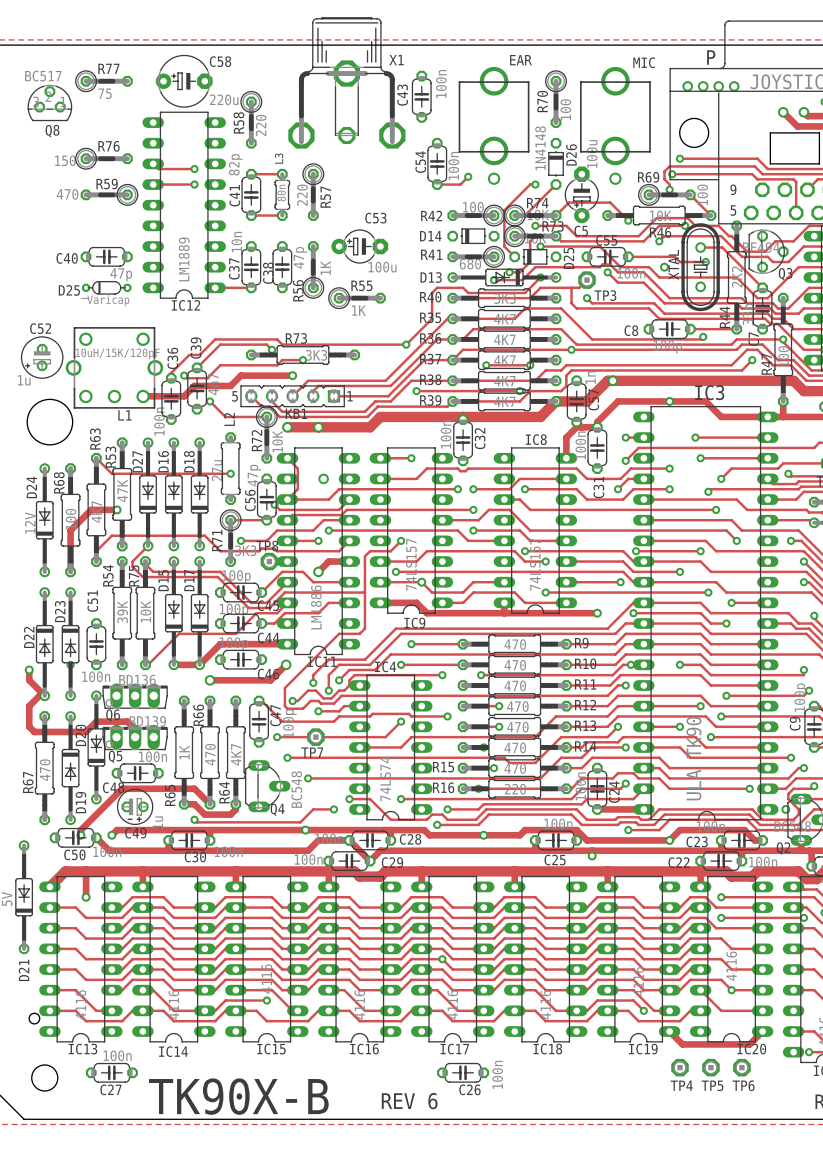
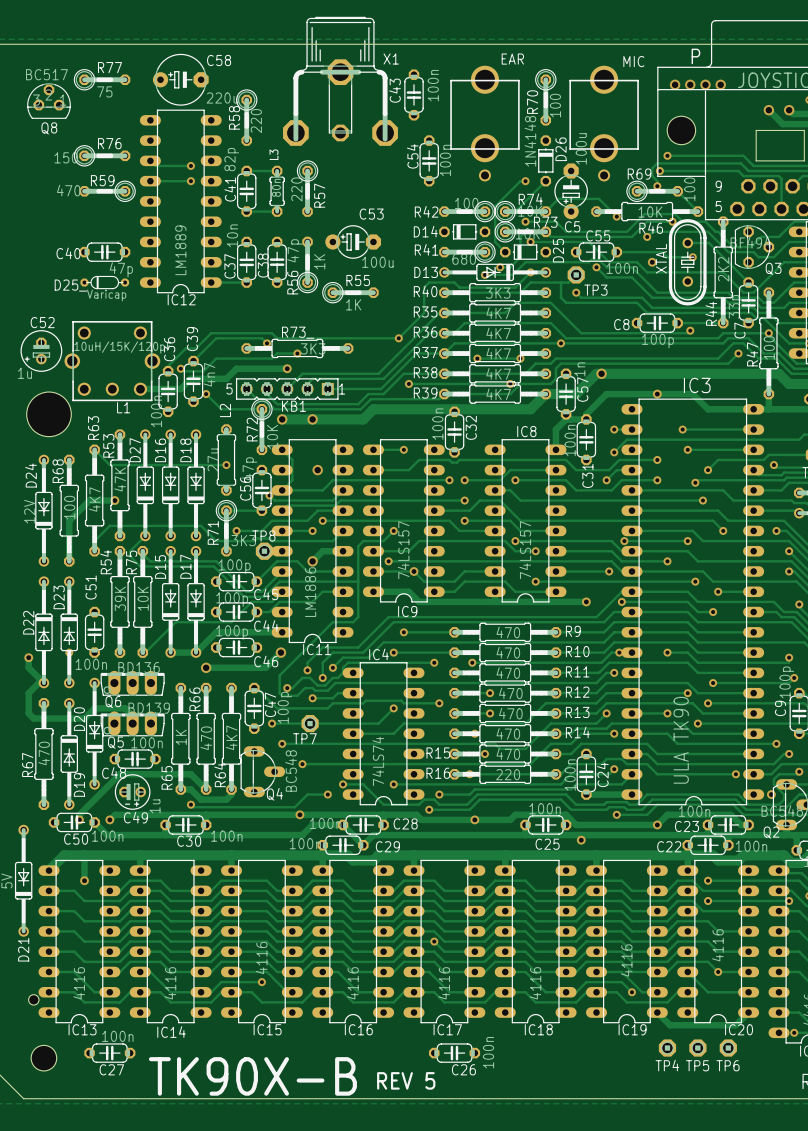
track: (468, 176) (460, 184) (437, 184) -> none
via: (468, 176) -> none
text: REV 6 (409, 1101) -> REV 5 (406, 1080)

